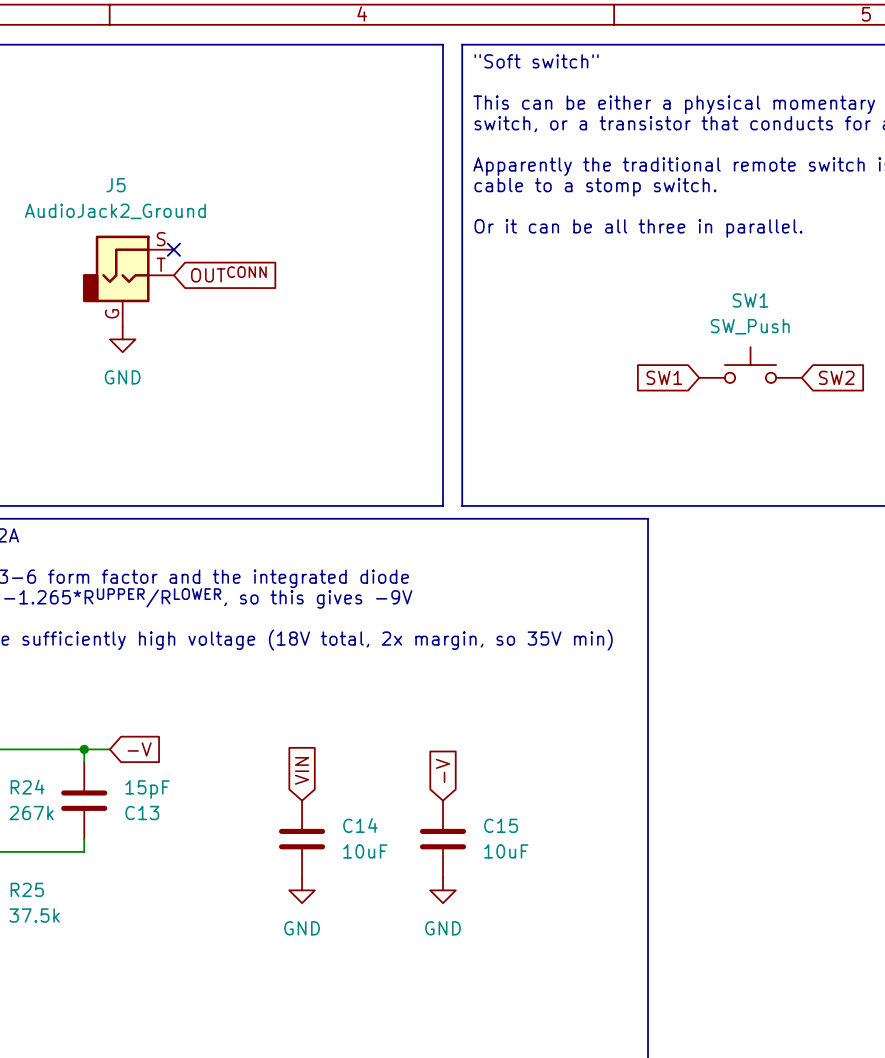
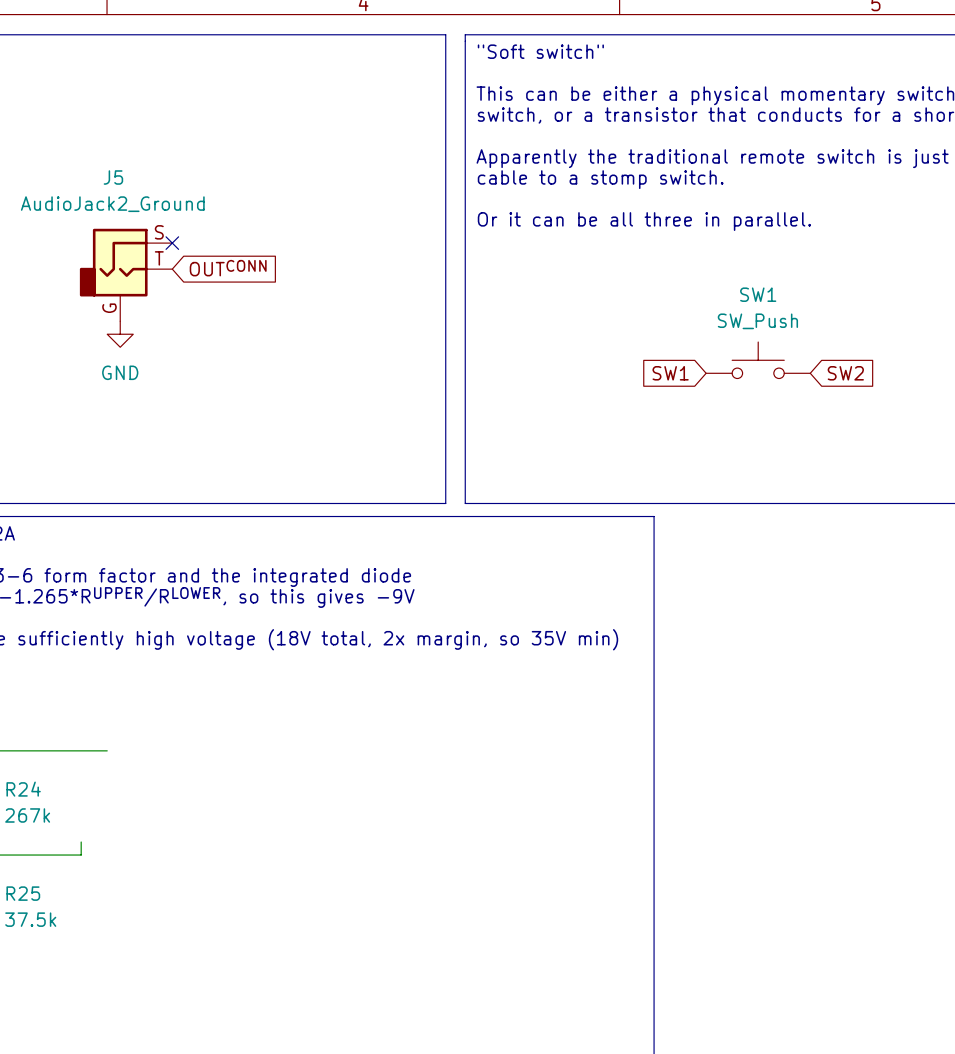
wire: (84, 749) (84, 762) -> none
junction: (84, 749) -> none
global label: -V (139, 749) -> none
global label: VIN (302, 770) -> none
global label: -V (443, 770) -> none
C13: 15pF (84, 800) -> none
C14: 10uF (302, 839) -> none
C15: 10uF (443, 839) -> none
power symbol: GND (302, 890) -> none
power symbol: GND (443, 890) -> none

